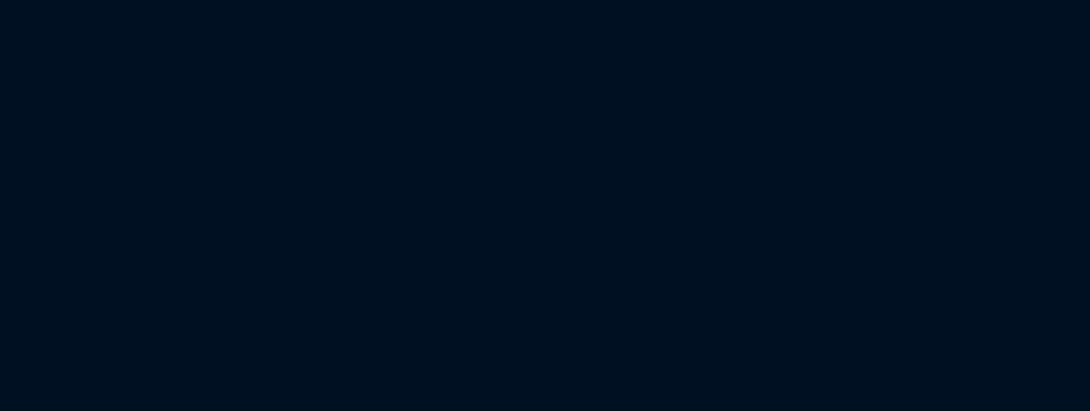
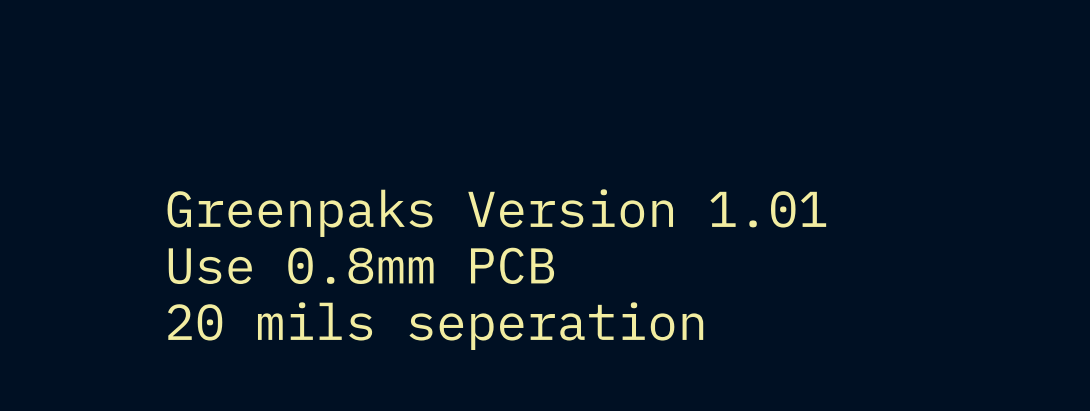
text: none -> Greenpaks Version 1.01 (496, 213)
text: none -> Use 0.8mm PCB (361, 265)
text: none -> 20 mils seperation (435, 326)

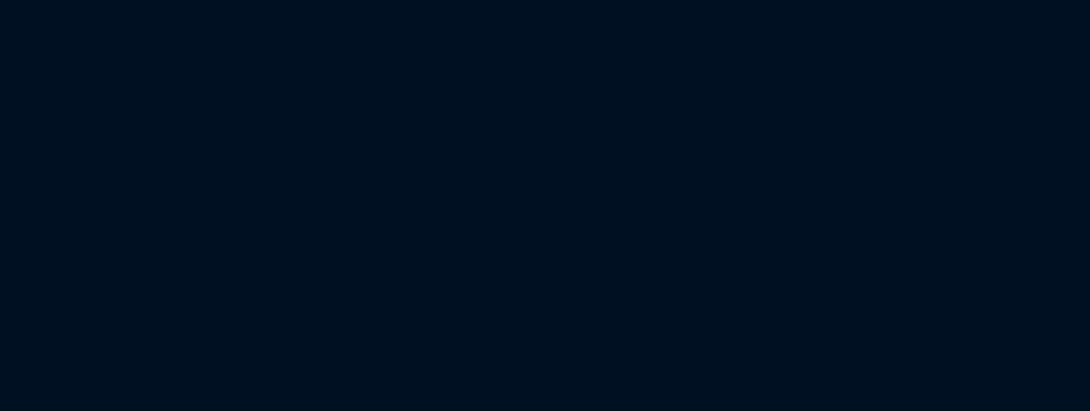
text: Greenpaks Version 1.01 (496, 213) -> none
text: Use 0.8mm PCB (361, 265) -> none
text: 20 mils seperation (435, 326) -> none

